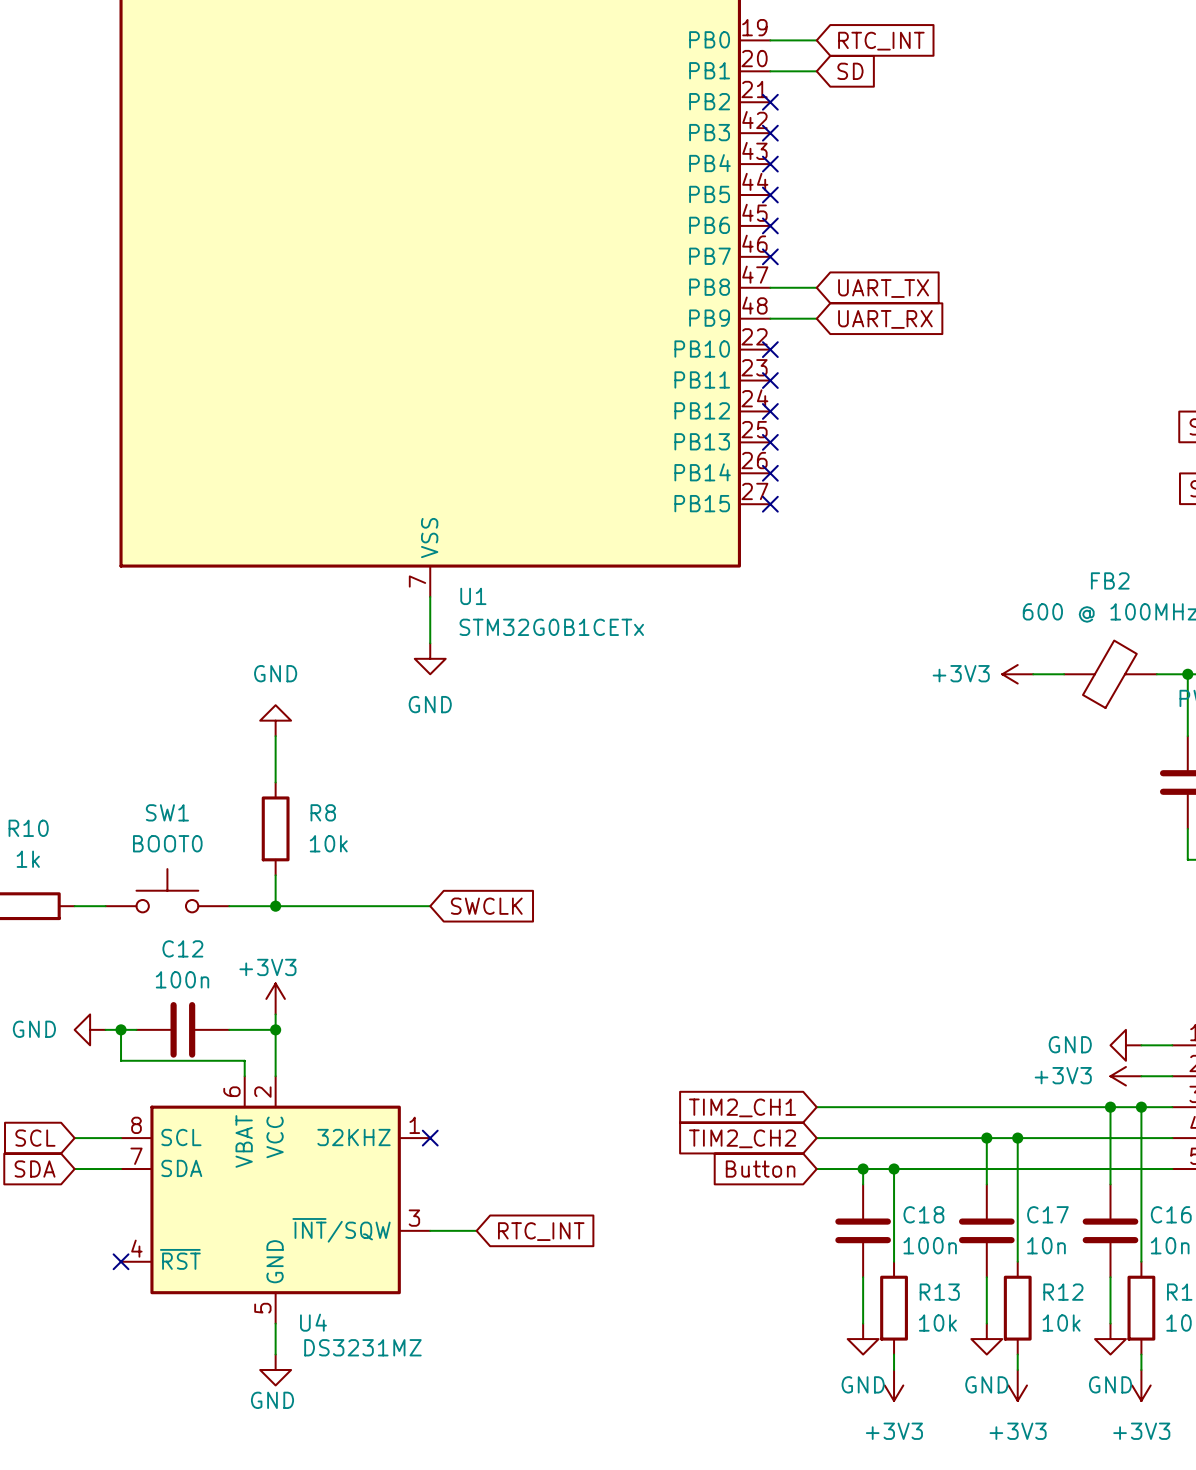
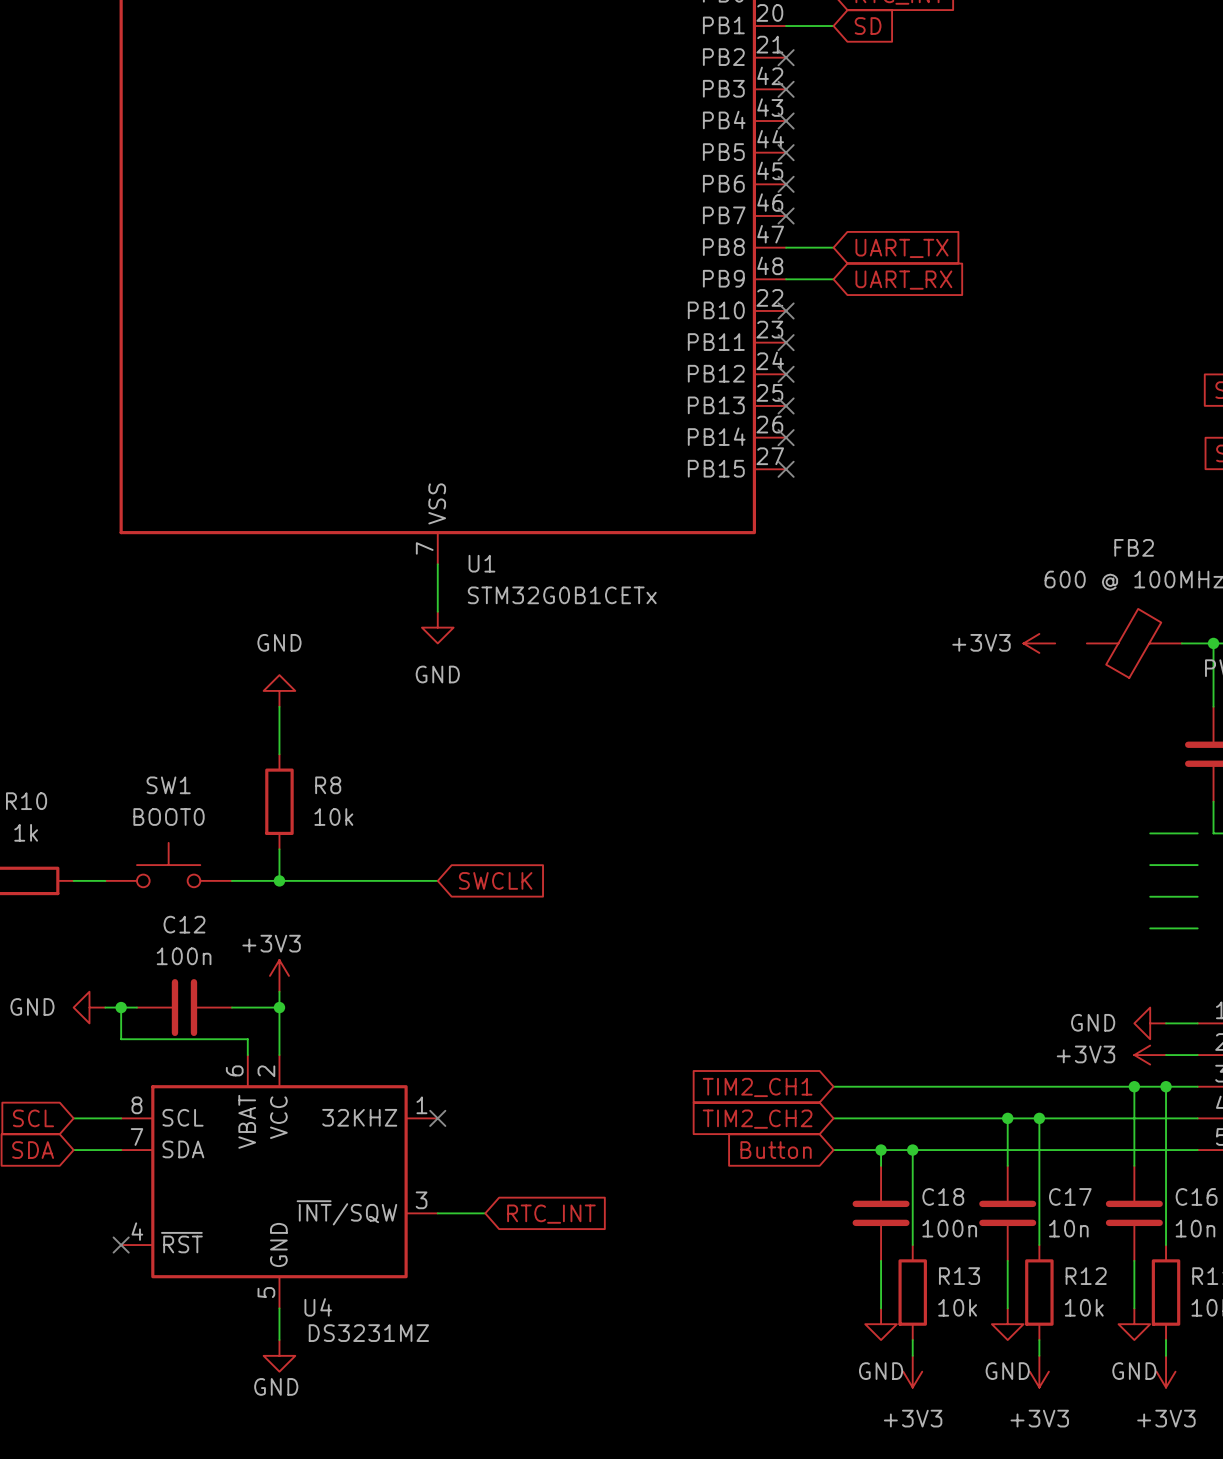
wire: (1033, 674) (1064, 674) -> none
wire: none -> (1150, 833) (1197, 833)
wire: none -> (1150, 865) (1197, 865)
wire: none -> (1150, 896) (1197, 896)
wire: none -> (1150, 928) (1197, 928)

